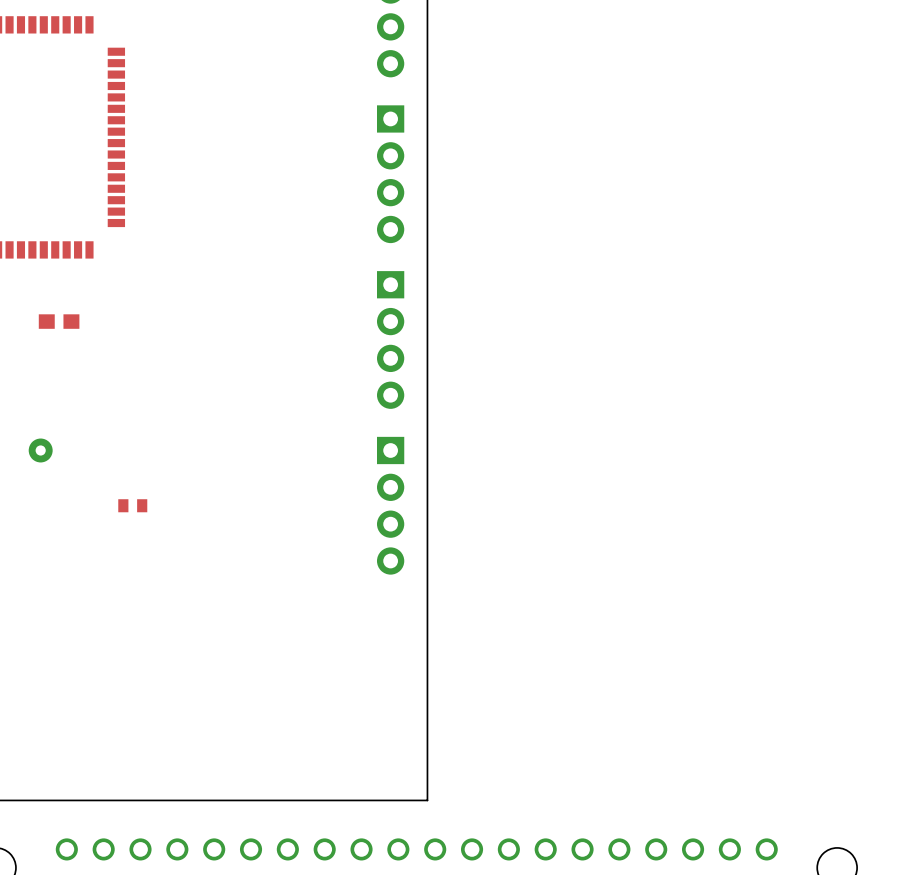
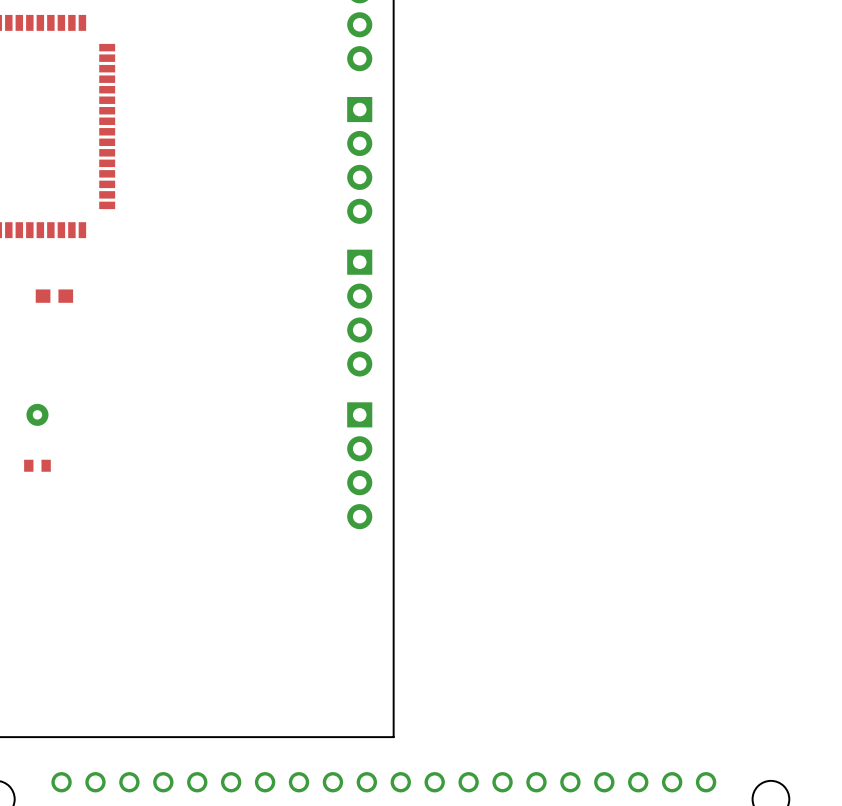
part position: (132, 505) -> (37, 465)

